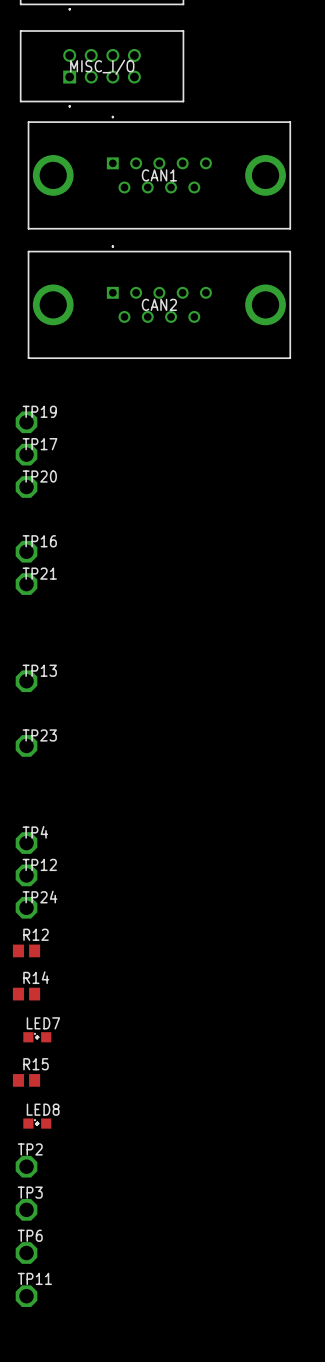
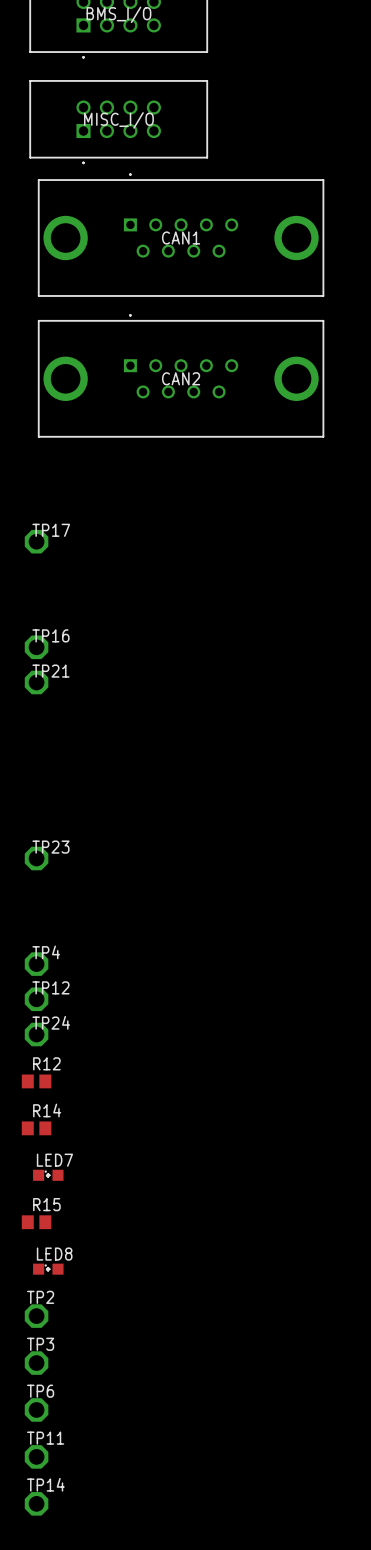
TP19: (26, 422) -> none
TP20: (26, 487) -> none
TP13: (26, 681) -> none
TP14: none -> (36, 1503)

